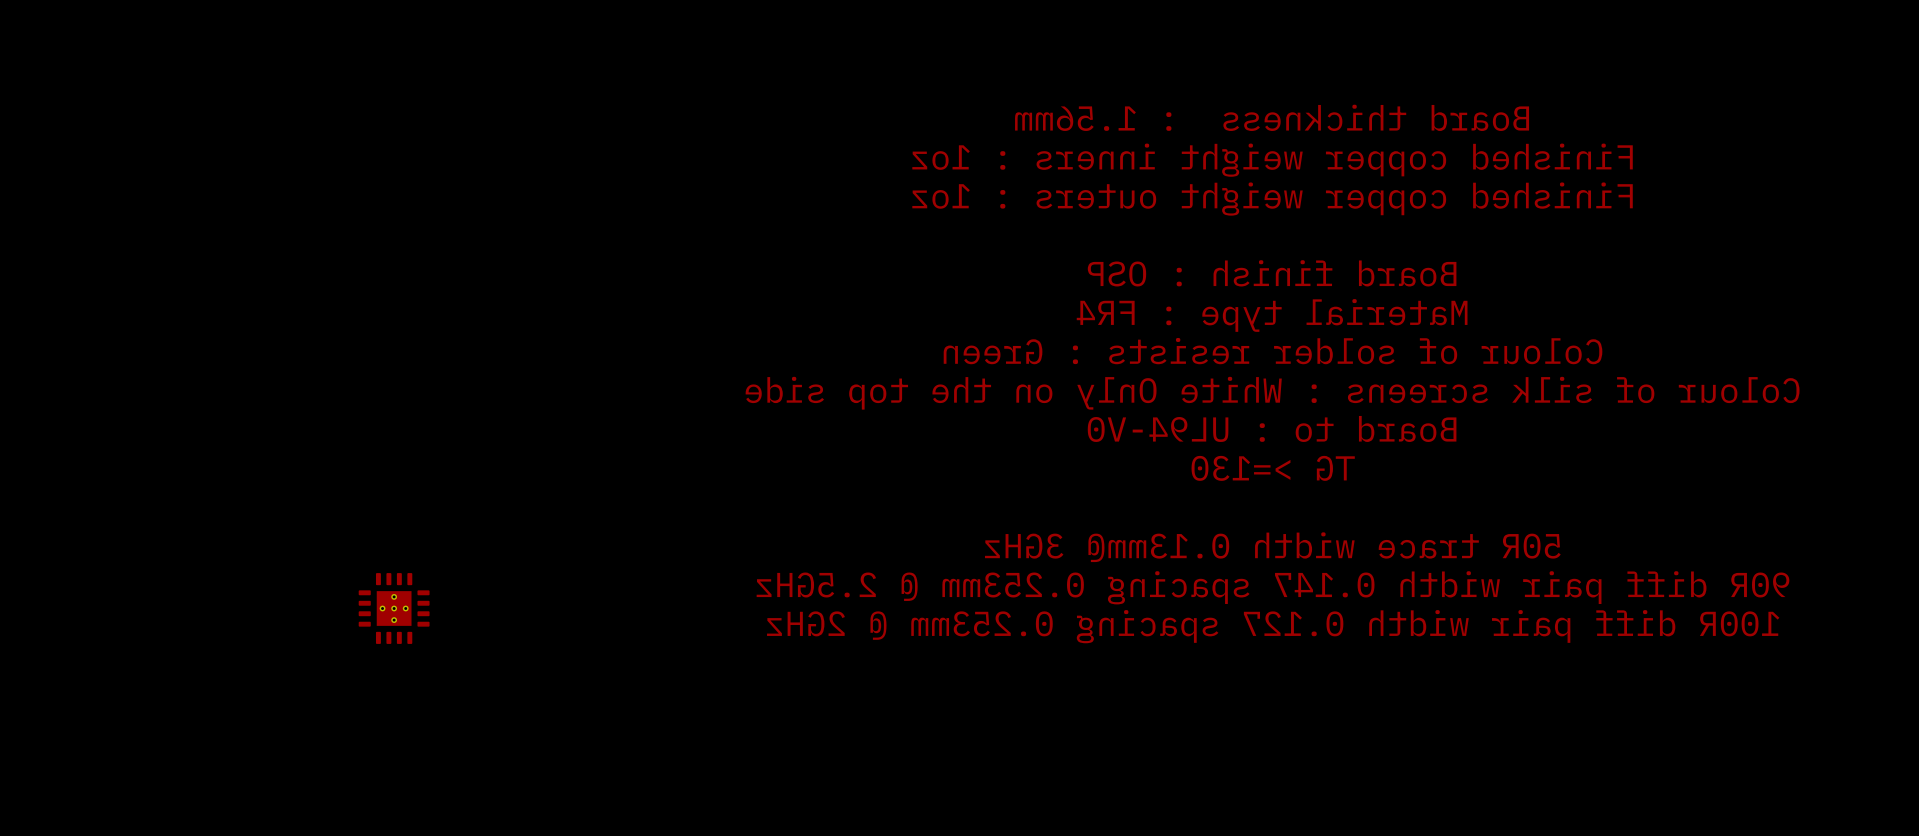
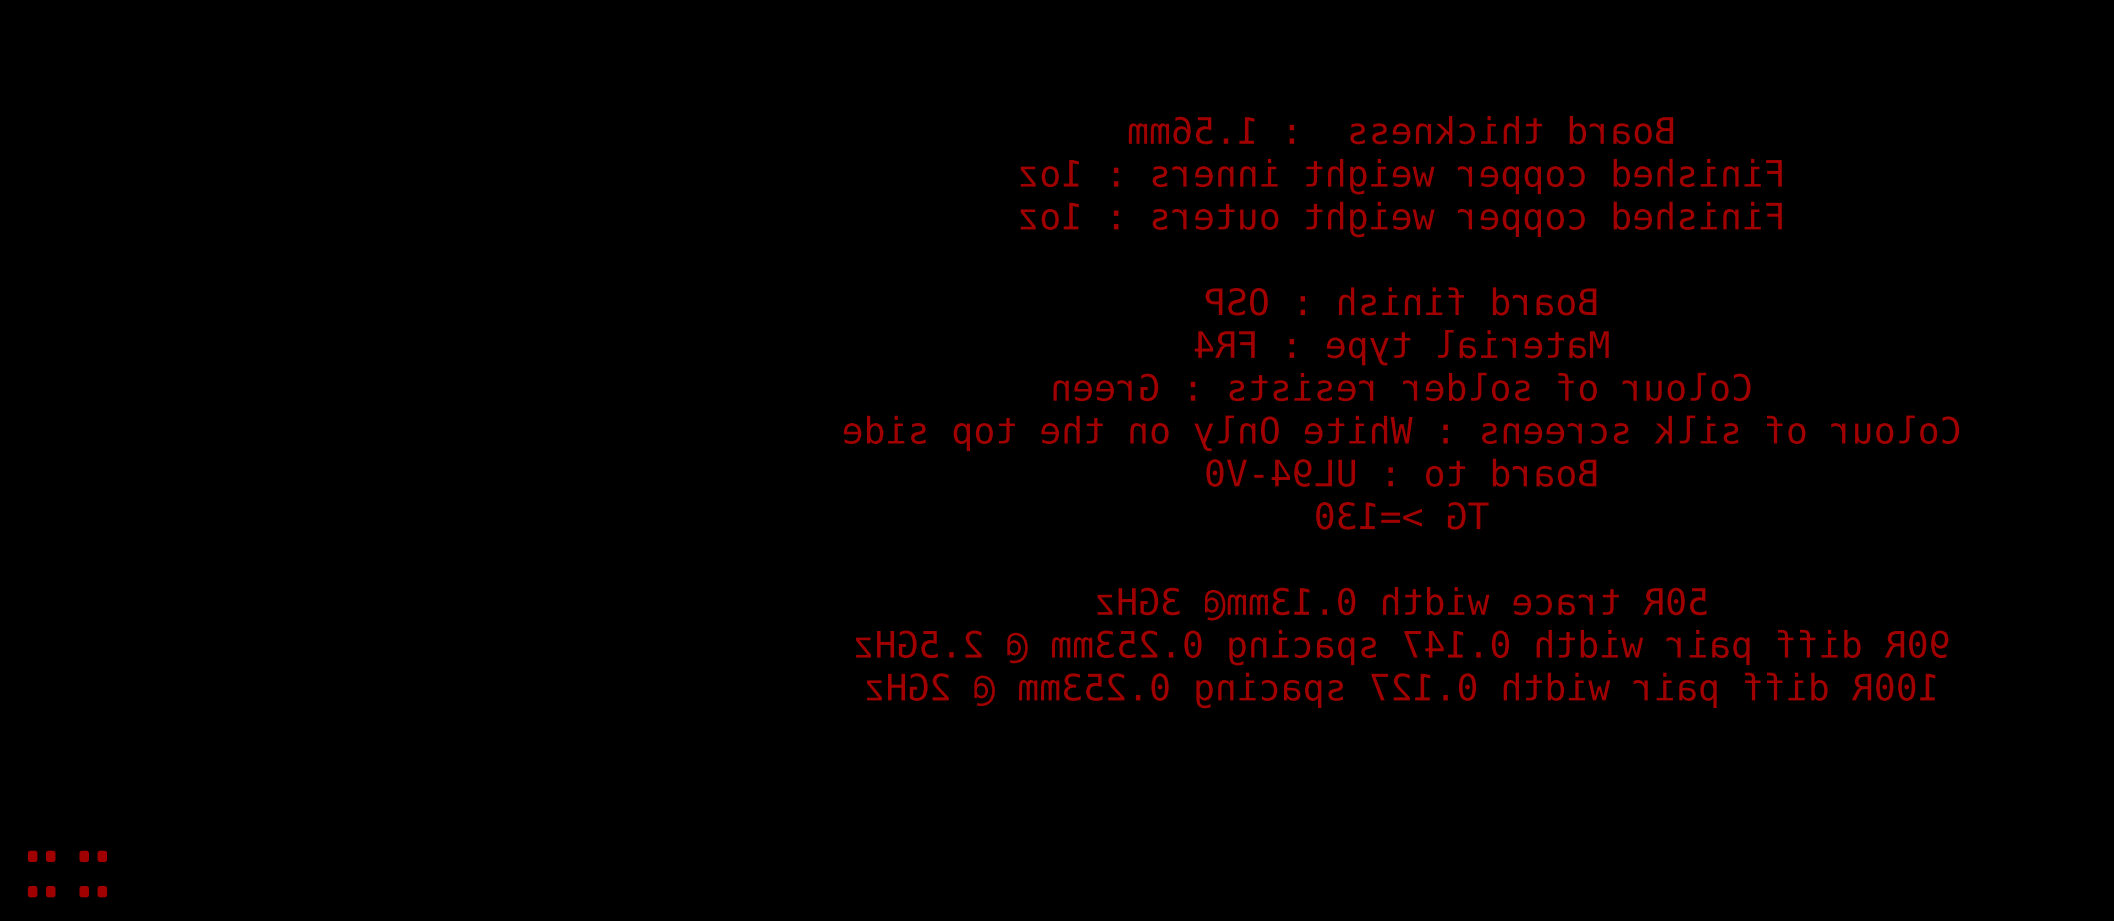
part: (394, 608) -> none
part: none -> (41, 856)
part: none -> (93, 856)
part: none -> (41, 891)
part: none -> (93, 891)

